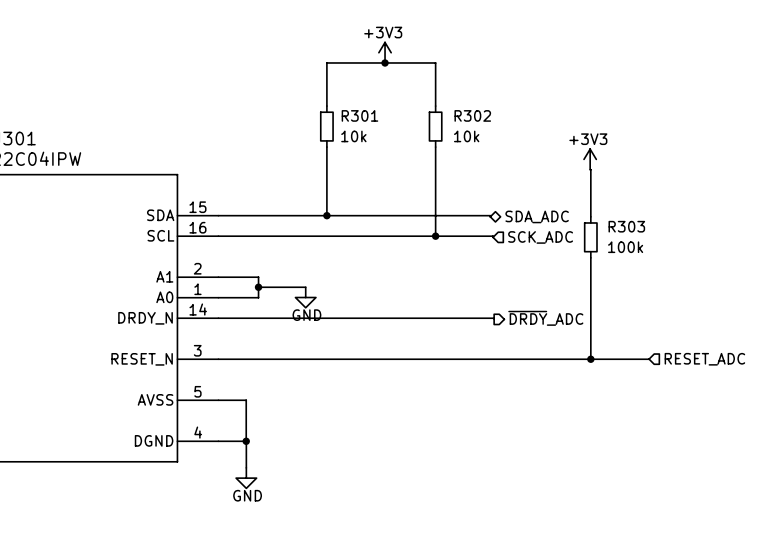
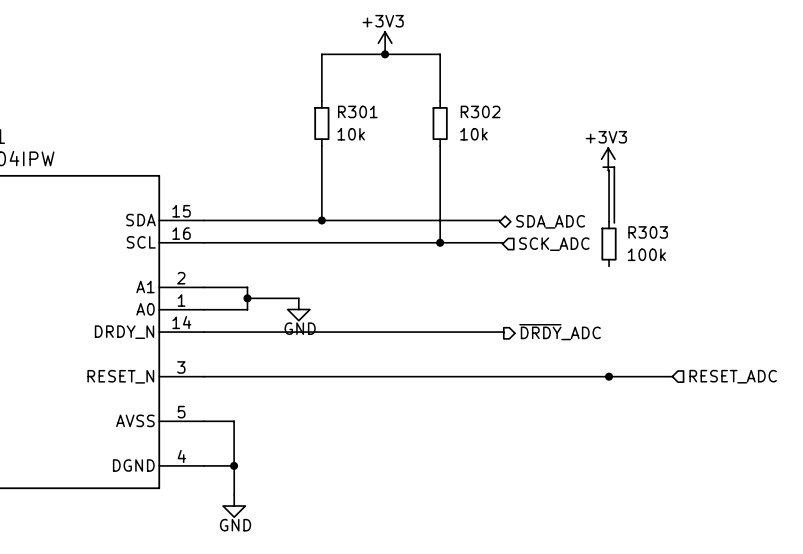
wire: none -> (603, 167) (614, 167) (614, 222)
wire: (590, 257) (590, 359) -> none

